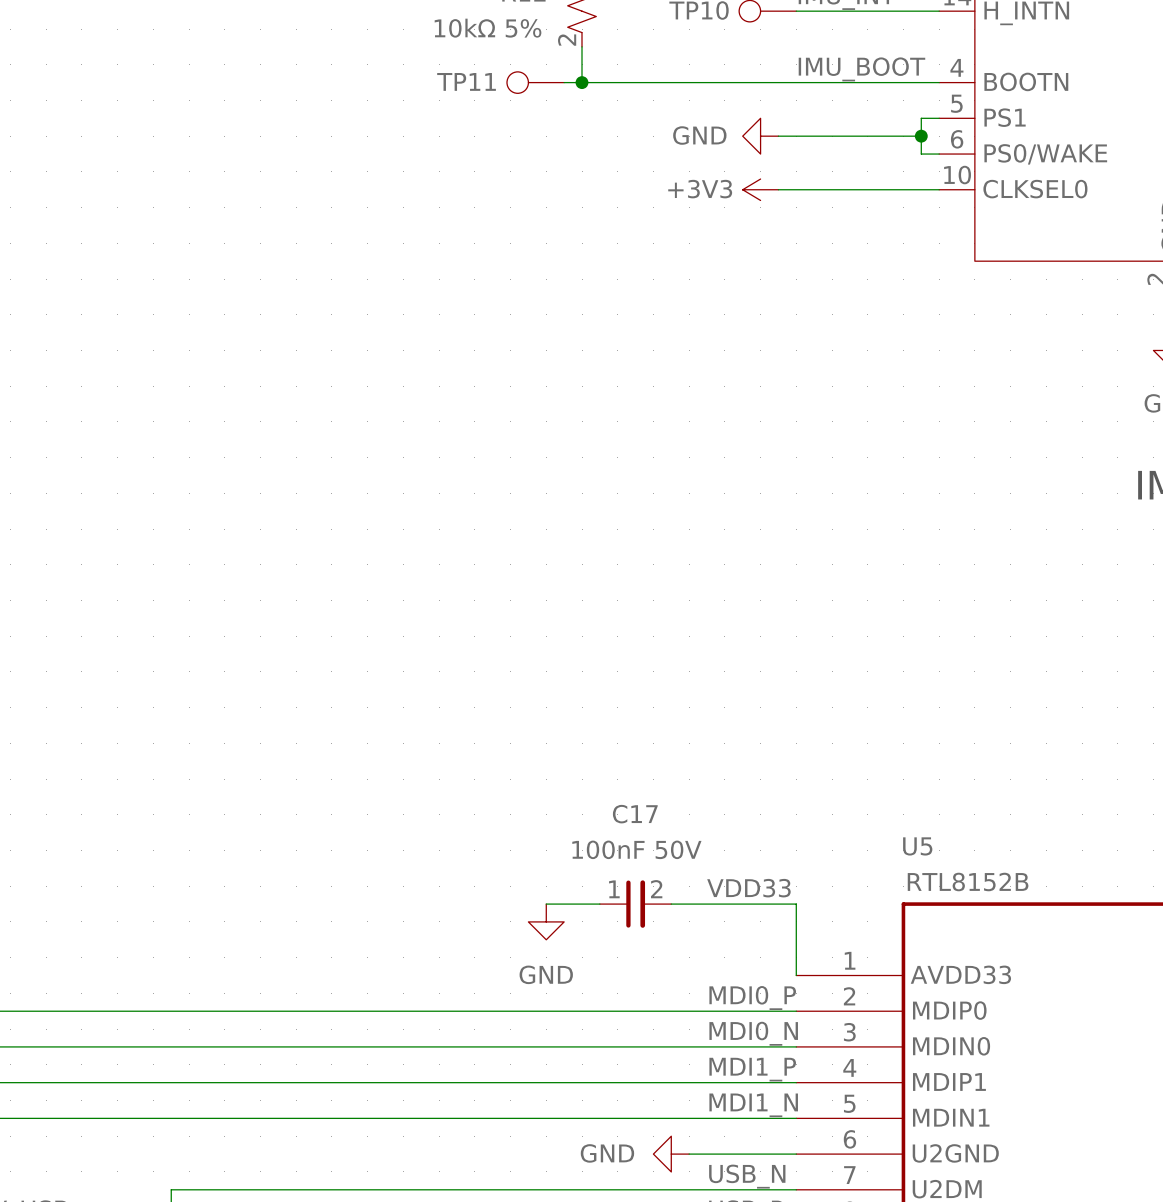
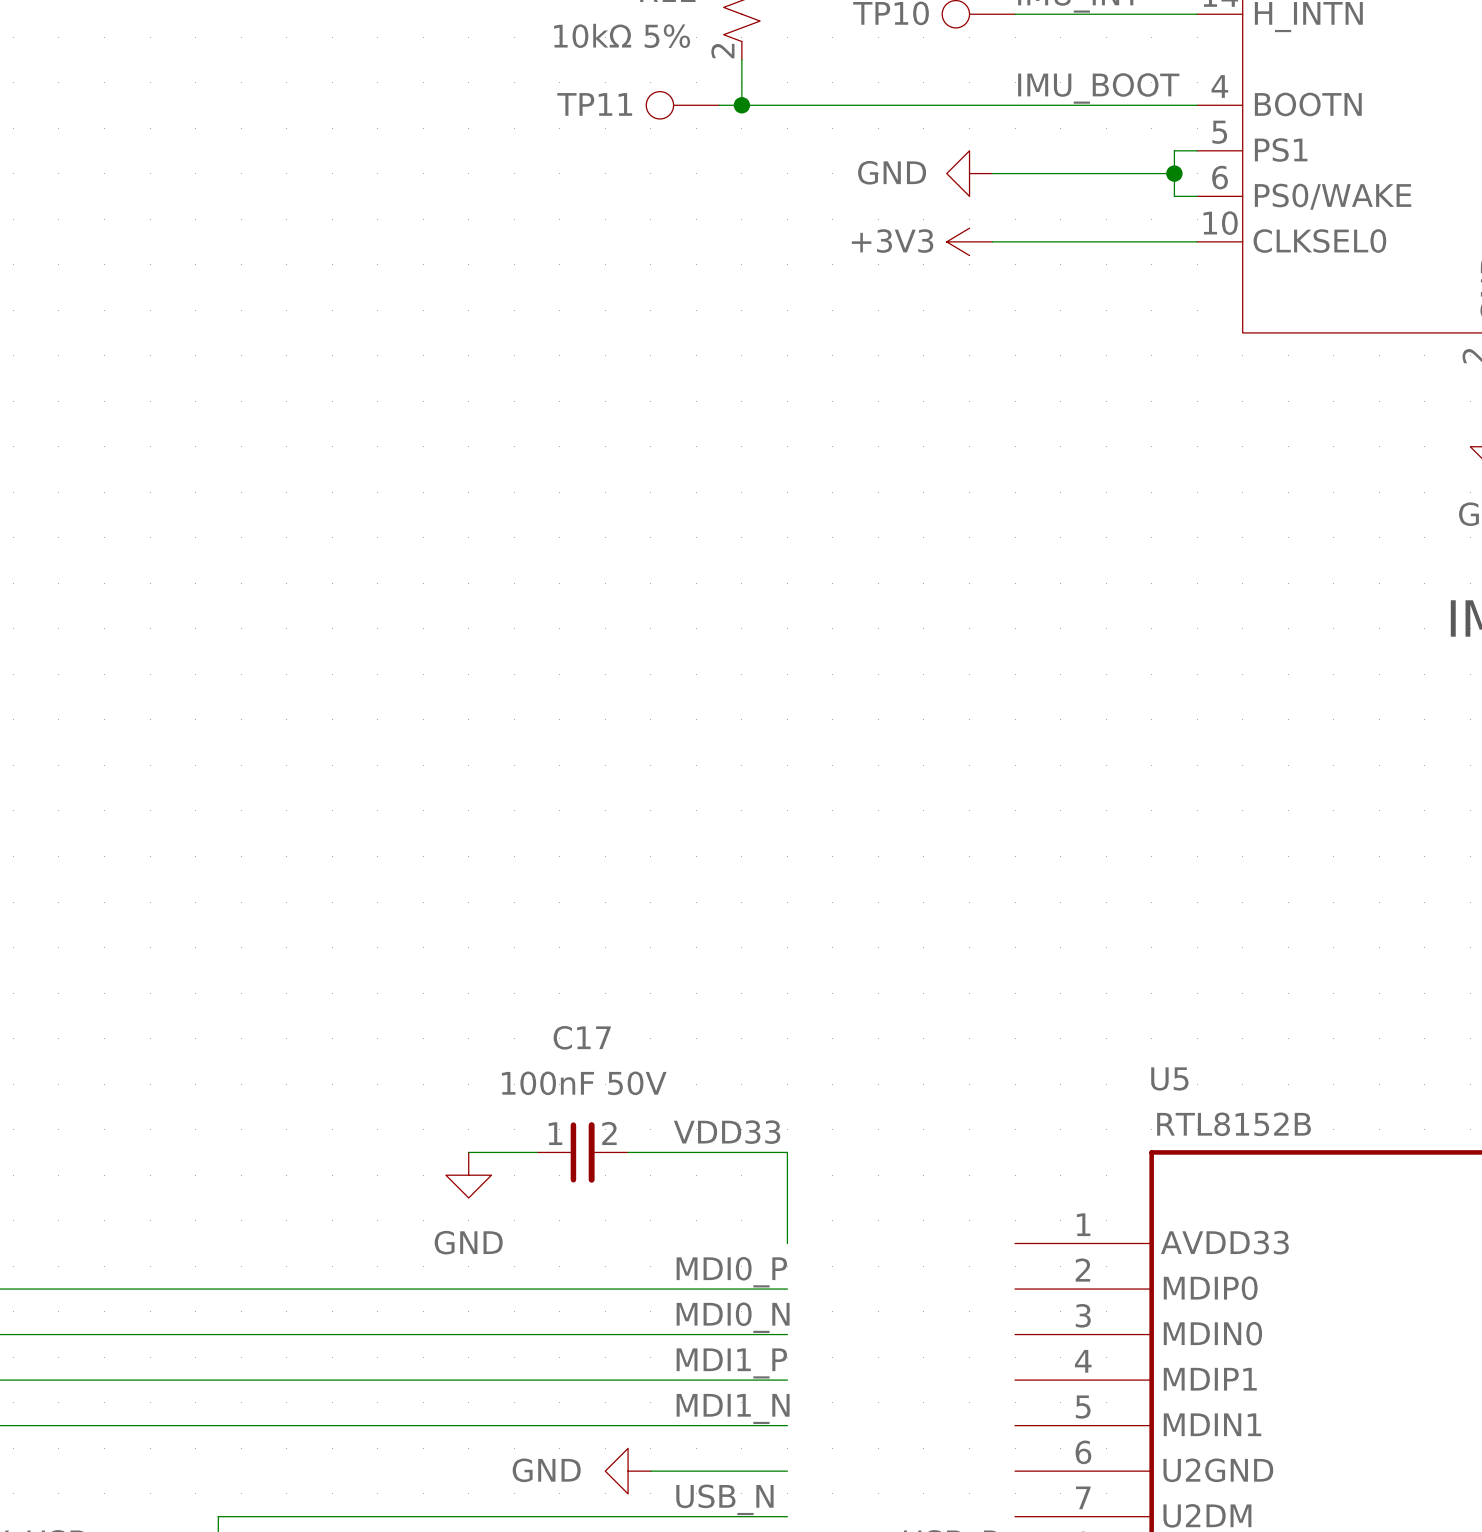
label position: VDD33 (748, 888) -> VDD33 (727, 1132)
wire: none -> (468, 1152) (537, 1152)
wire: none -> (628, 1152) (696, 1152)
wire: none -> (764, 1152) (787, 1152) (787, 1243)
C17 position: (635, 904) -> (582, 1152)
wire: (671, 904) (796, 904) (796, 975) -> none
power symbol: none -> GND (468, 1175)
power symbol: GND (546, 921) -> none
label position: MDI0_P (752, 998) -> MDI0_P (731, 1272)
wire: (617, 1011) (796, 1011) -> none
label position: MDI0_N (753, 1033) -> MDI0_N (733, 1317)
wire: (617, 1046) (796, 1046) -> none
label position: MDI1_P (752, 1069) -> MDI1_P (731, 1363)
wire: (617, 1082) (796, 1082) -> none
label position: MDI1_N (753, 1105) -> MDI1_N (733, 1408)
wire: (617, 1118) (796, 1118) -> none
power symbol: none -> GND (628, 1471)
power symbol: GND (671, 1154) -> none
wire: (689, 1154) (796, 1154) -> (650, 1471) (787, 1471)
label position: USB_N (747, 1176) -> USB_N (724, 1499)
wire: (617, 1189) (796, 1189) -> none

